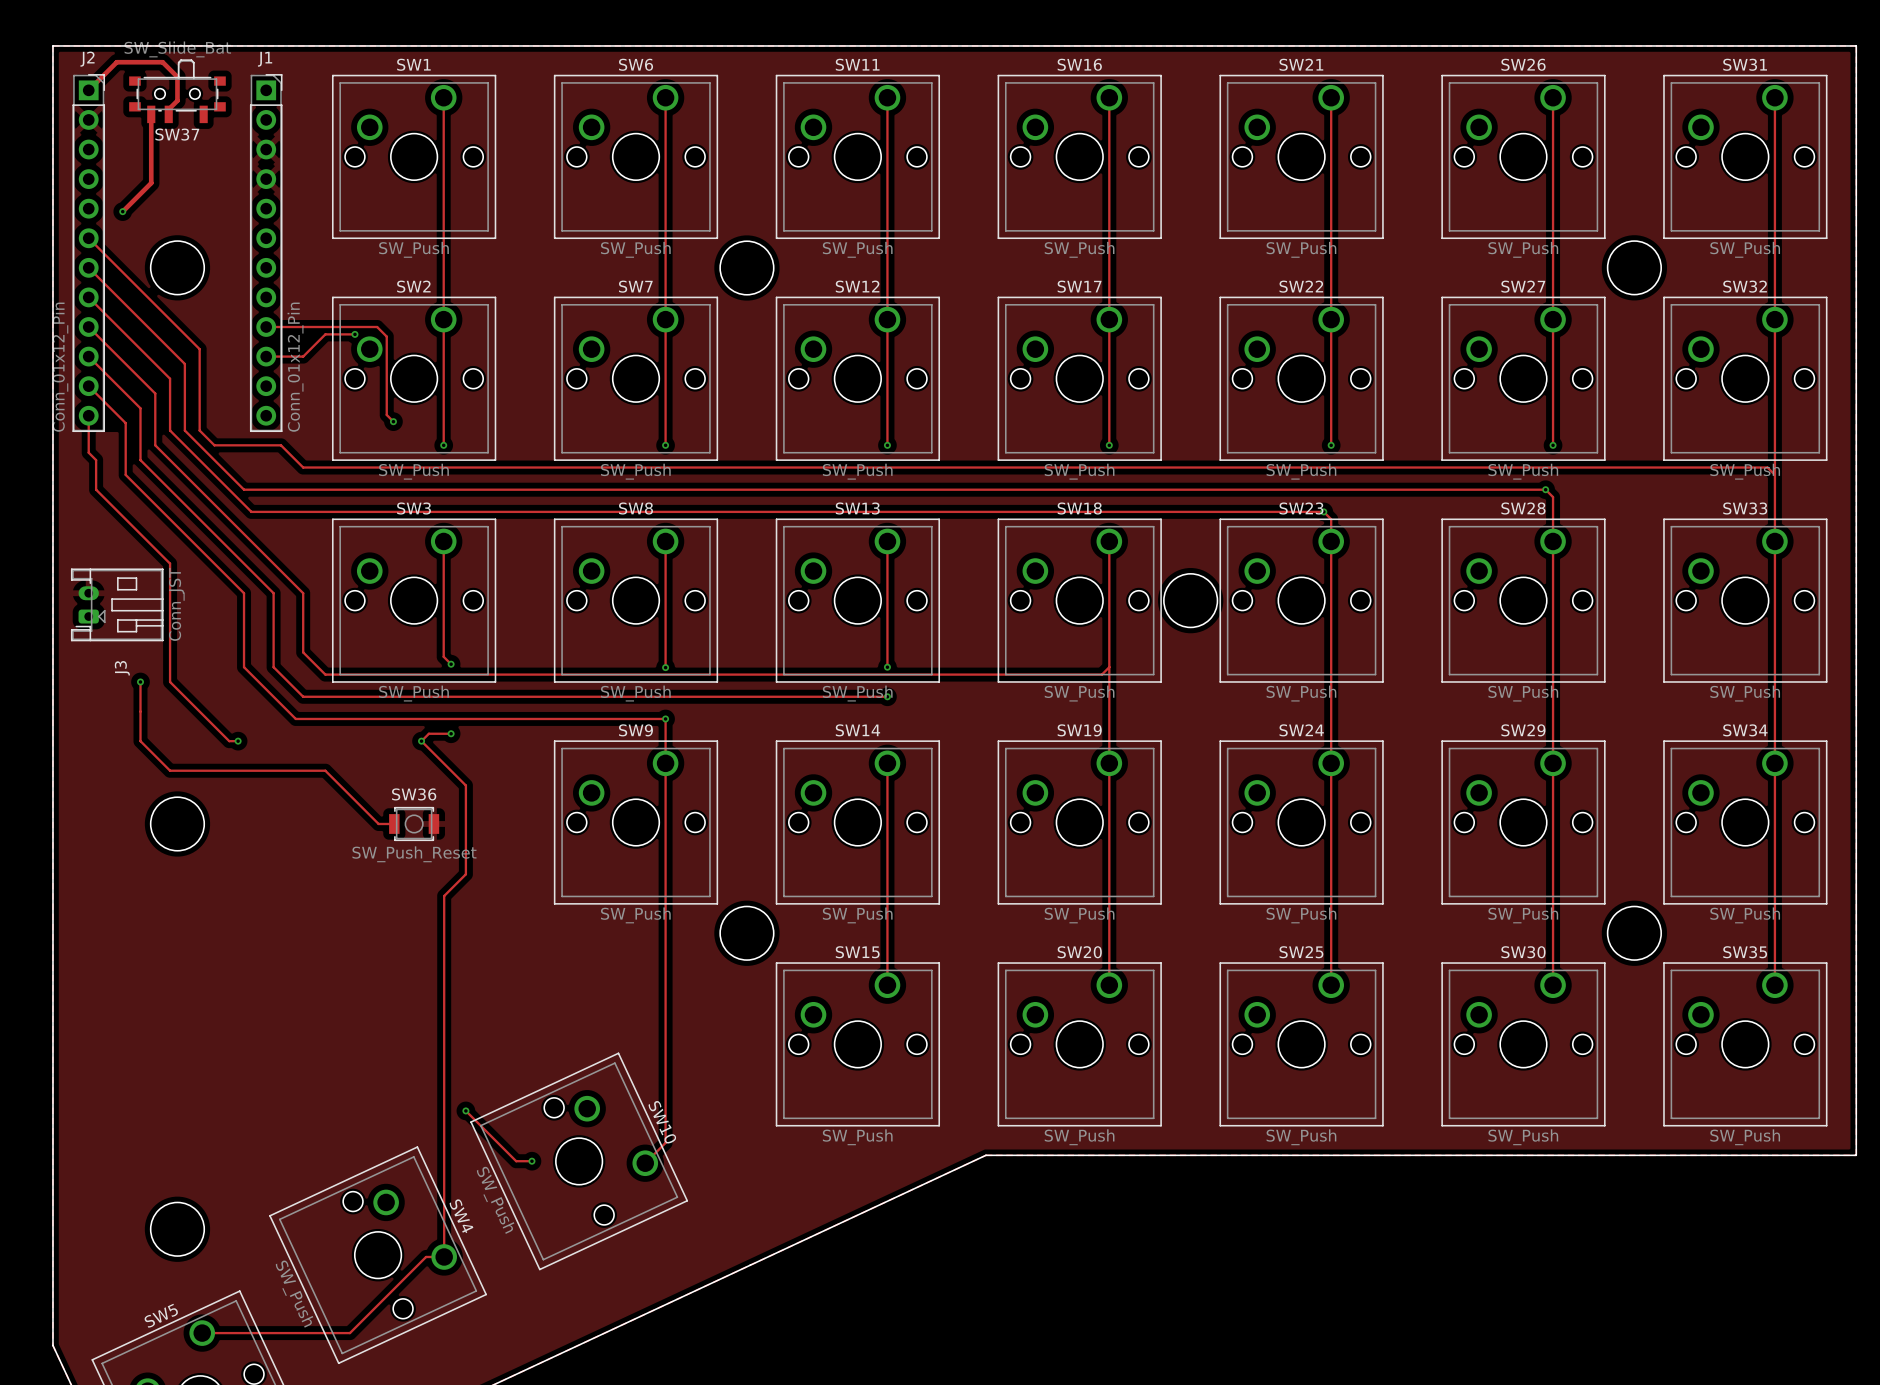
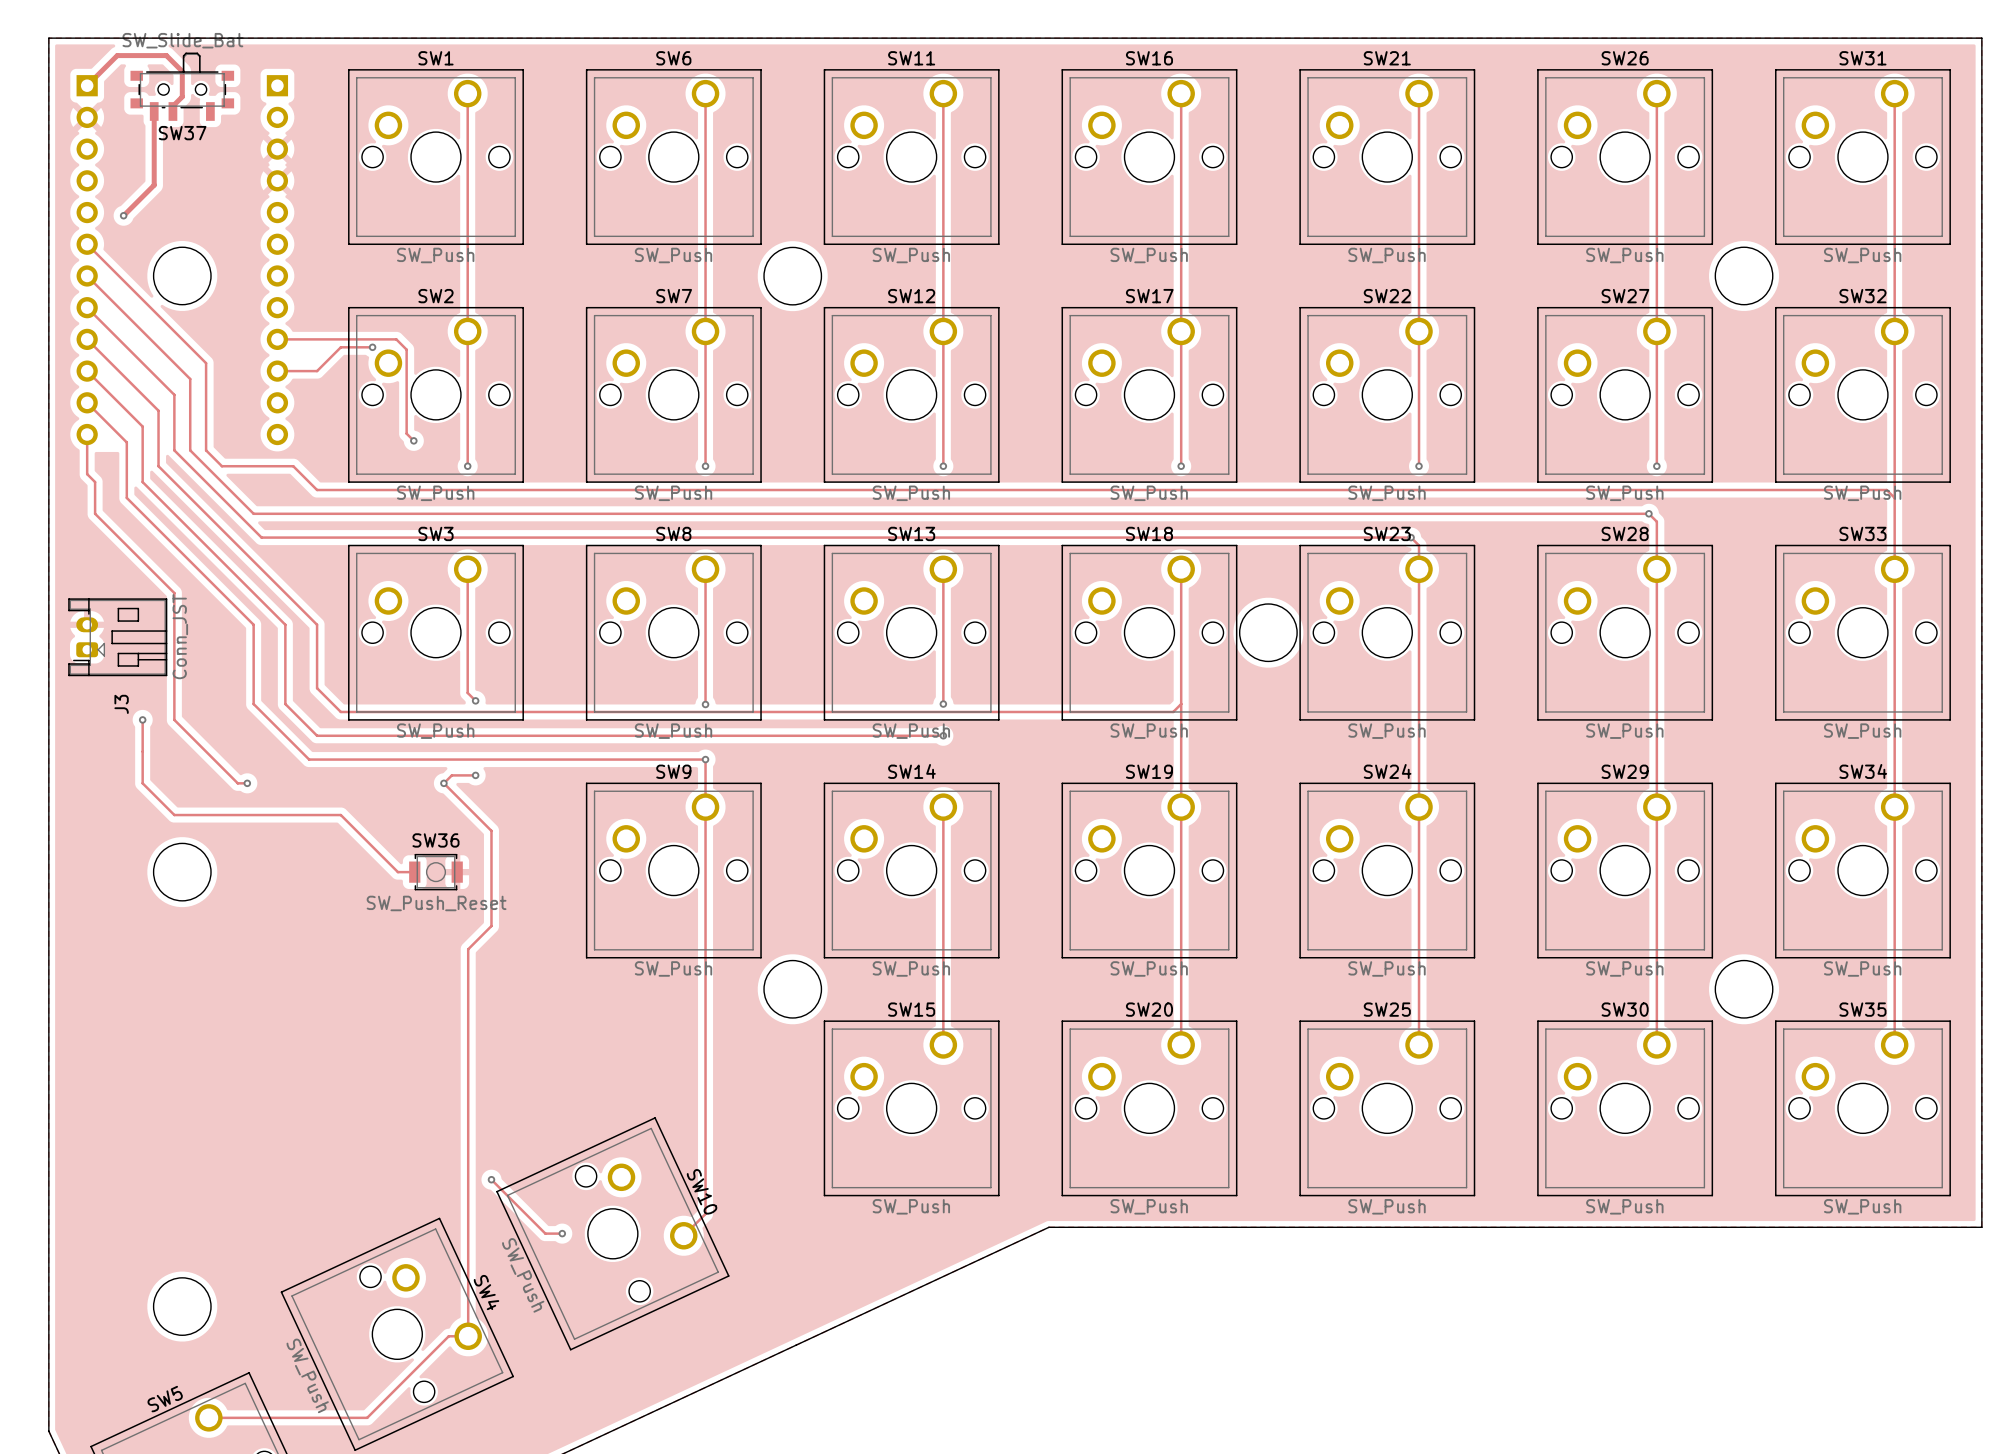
J2 side: top (88, 253) -> bottom (87, 260)
J1 side: top (266, 253) -> bottom (277, 260)

